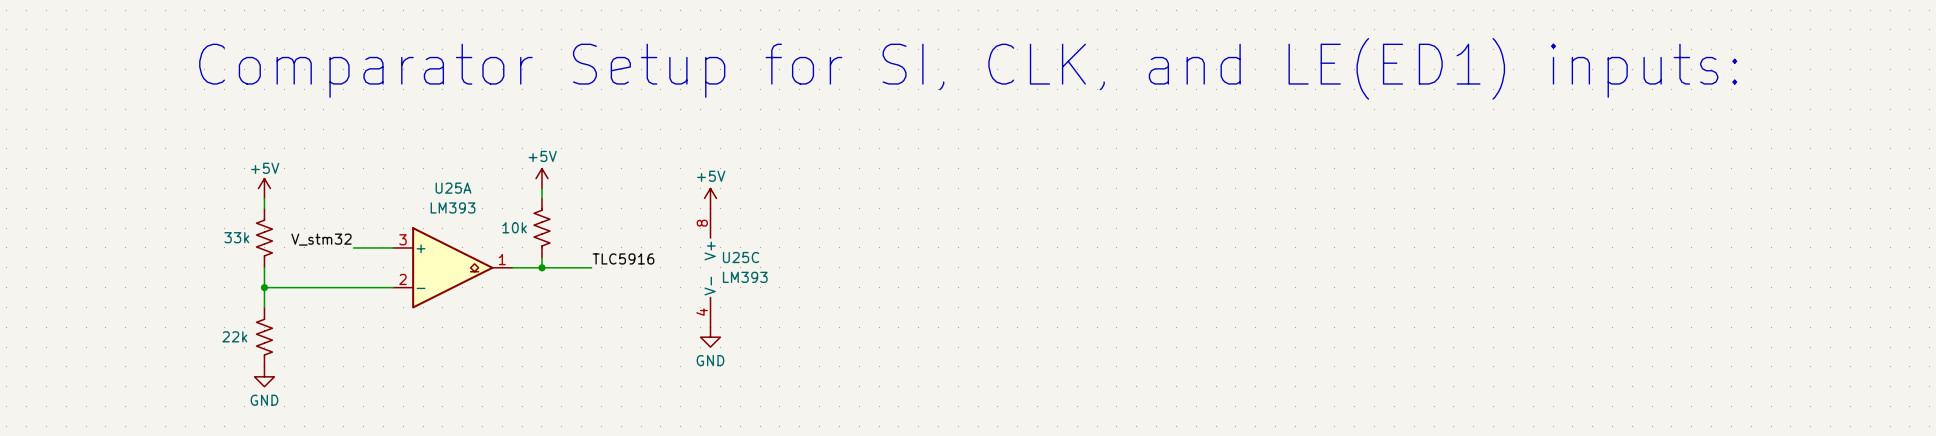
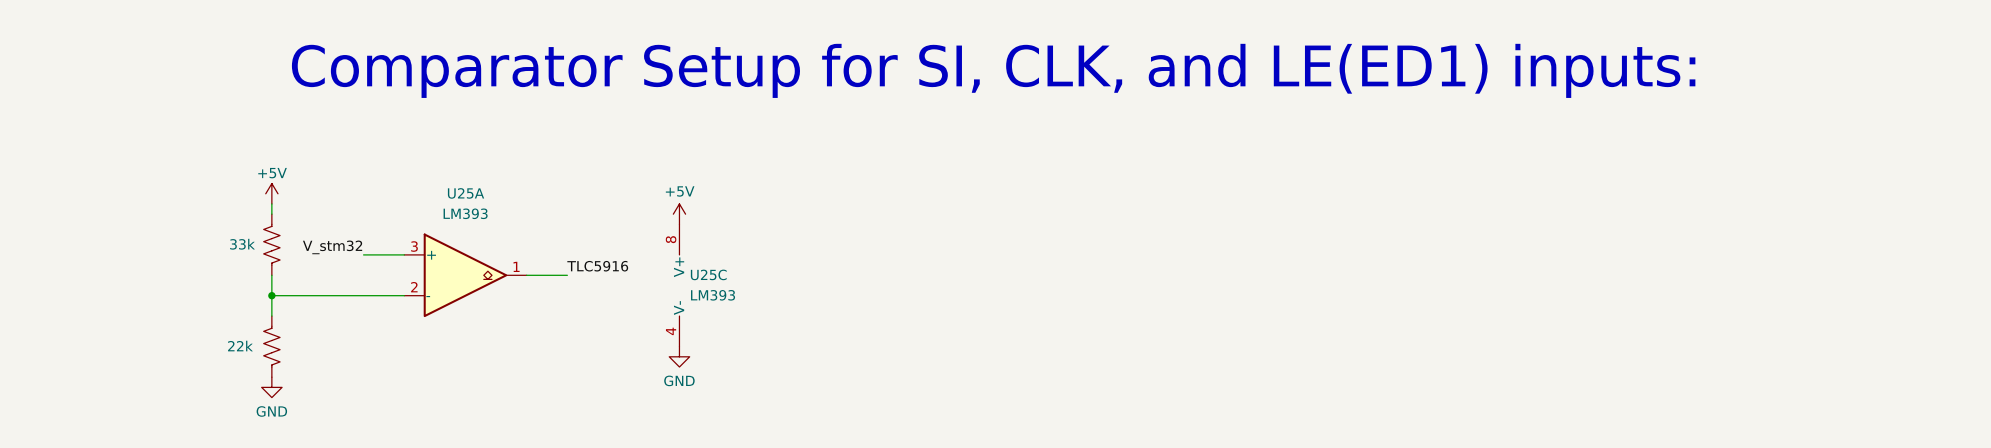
power symbol: +5V (541, 178) -> none
wire: (541, 188) (541, 198) -> none
power symbol position: +5V (710, 198) -> +5V (679, 214)
part: 10k (541, 228) -> none
wire: (541, 257) (541, 267) -> none
label position: TLC5916 (623, 258) -> TLC5916 (597, 266)
junction: (541, 267) -> none
wire: (551, 267) (591, 267) -> none
U25C position: (710, 267) -> (679, 285)
power symbol position: GND (710, 337) -> GND (679, 356)

